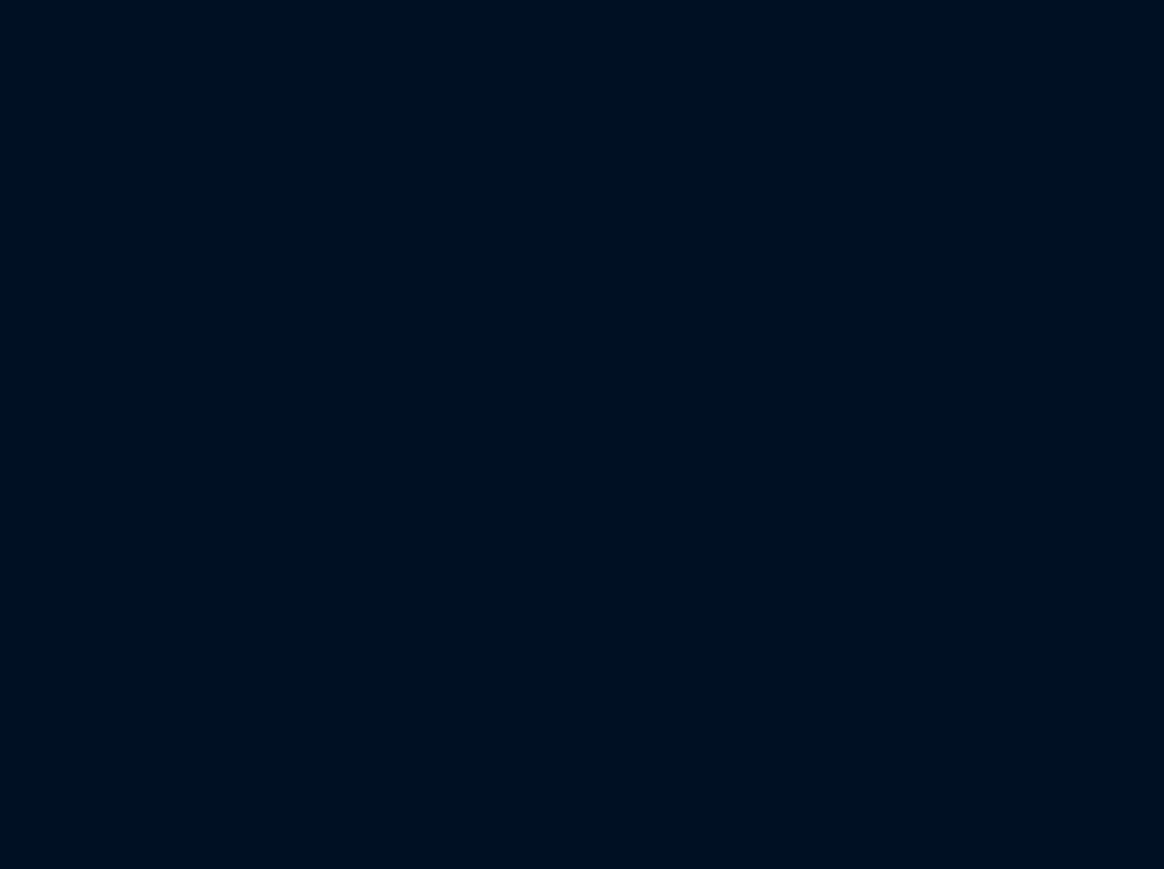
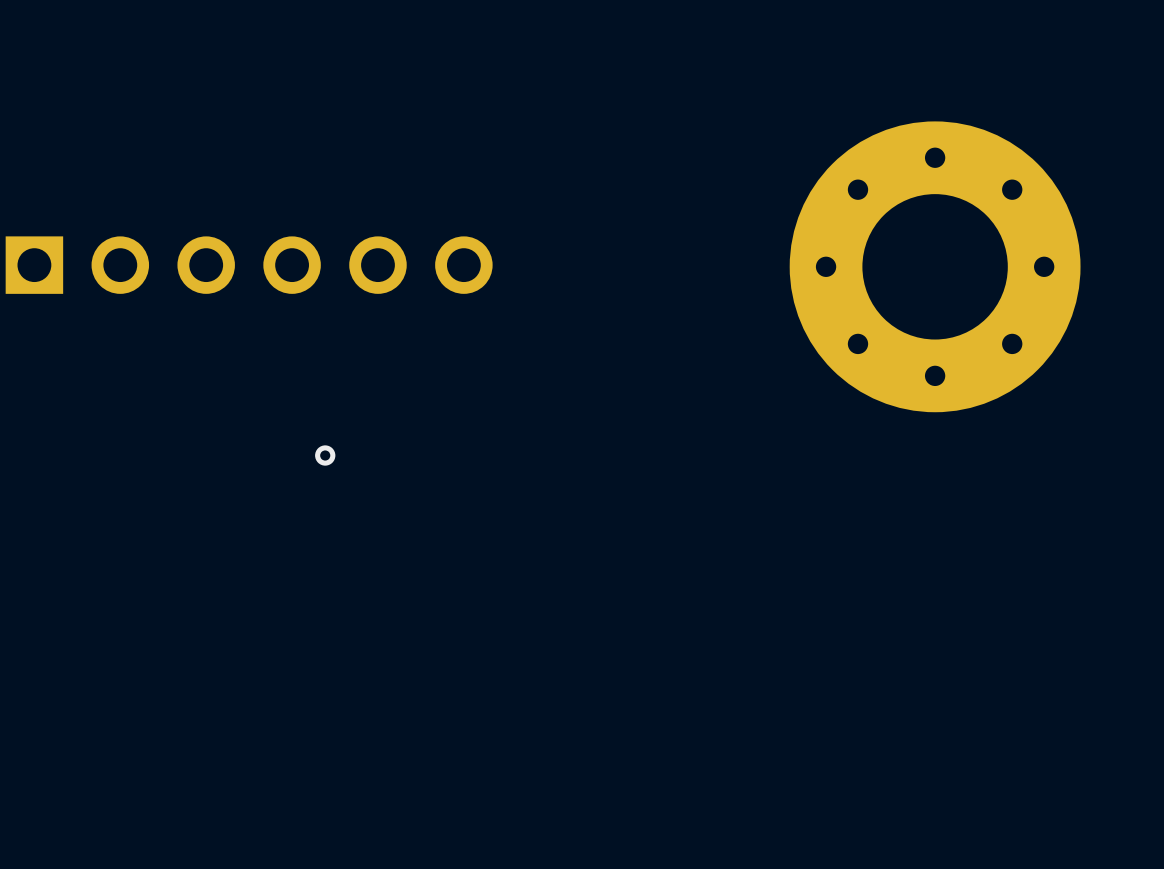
part: none -> (249, 265)
part: none -> (935, 266)
via: none -> (325, 455)

